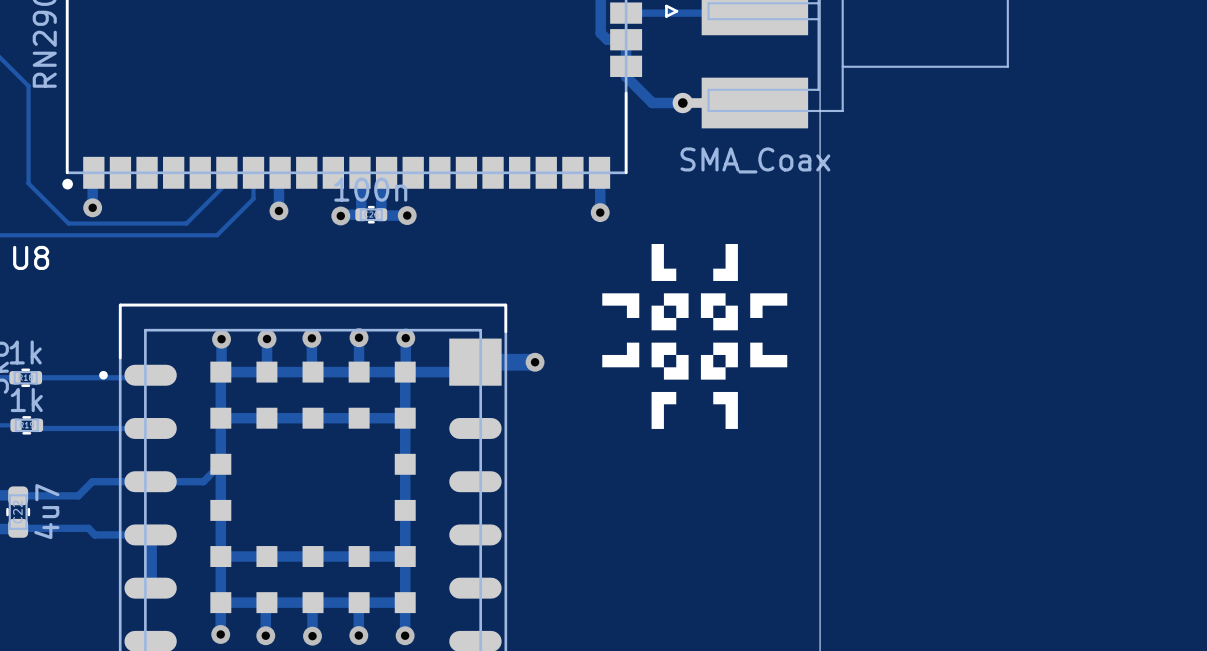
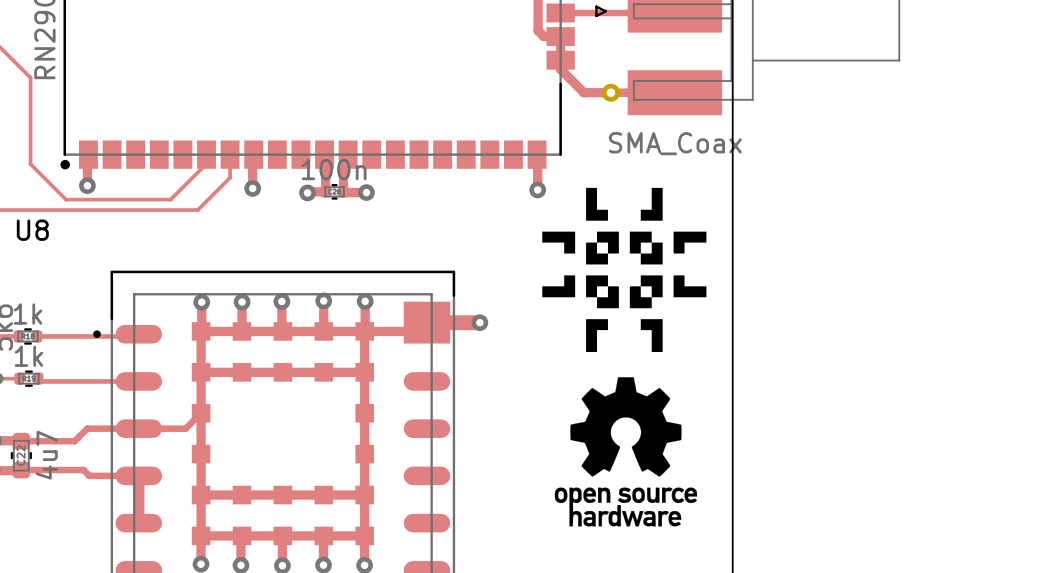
drawing position: (694, 336) -> (624, 269)
drawing: none -> [554, 377, 698, 527]

